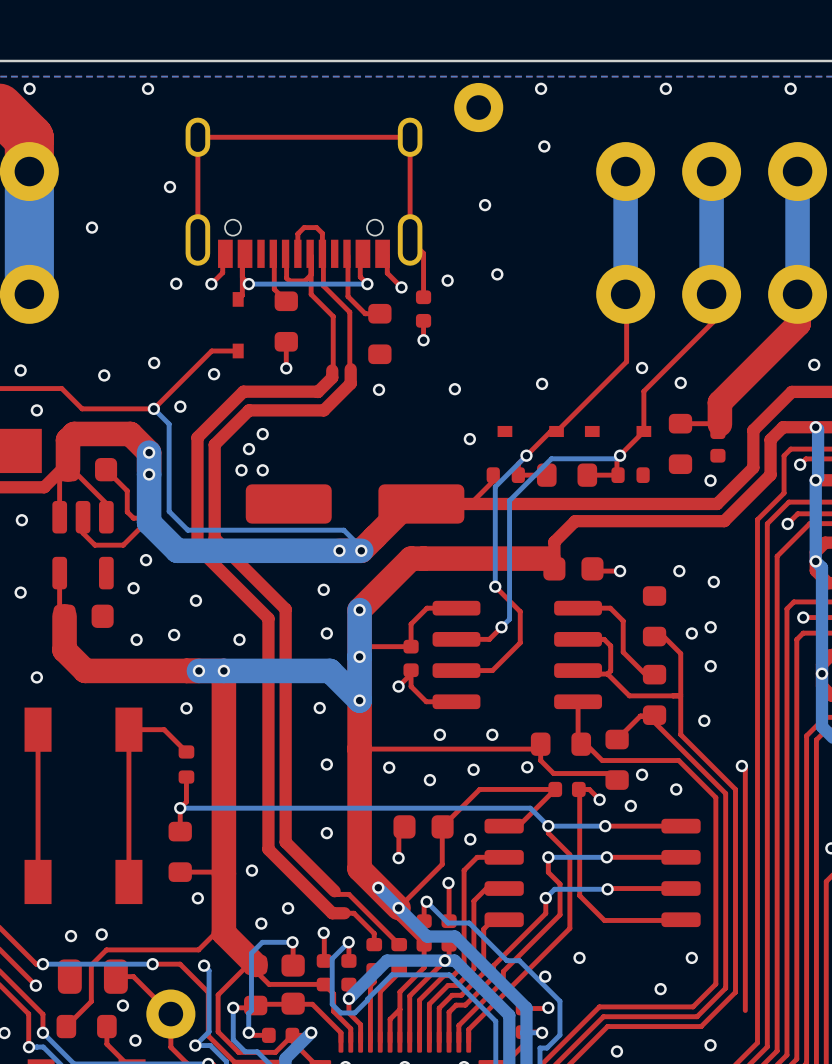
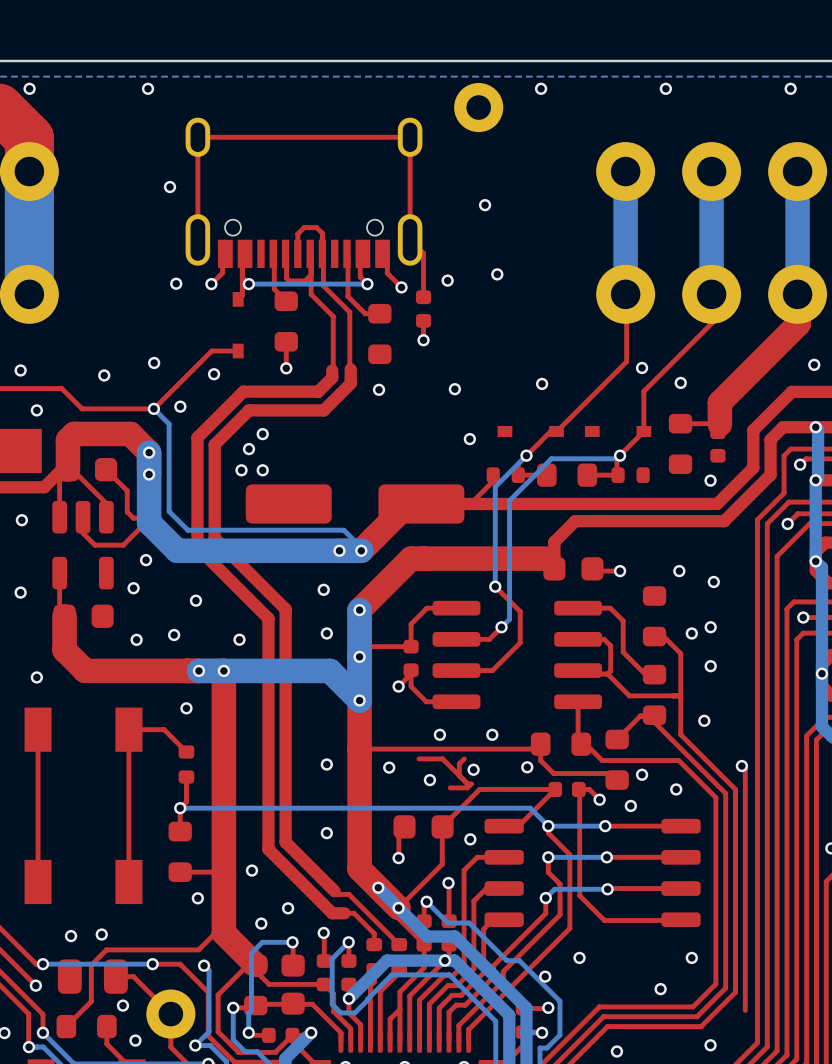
via: (544, 146) -> none
via: (92, 227) -> none
via: (319, 708) -> none
top track: none -> (419, 758) (442, 758) (467, 784) (471, 784) (467, 787) (450, 787)
top track: none -> (464, 758) (459, 763) (459, 775)

